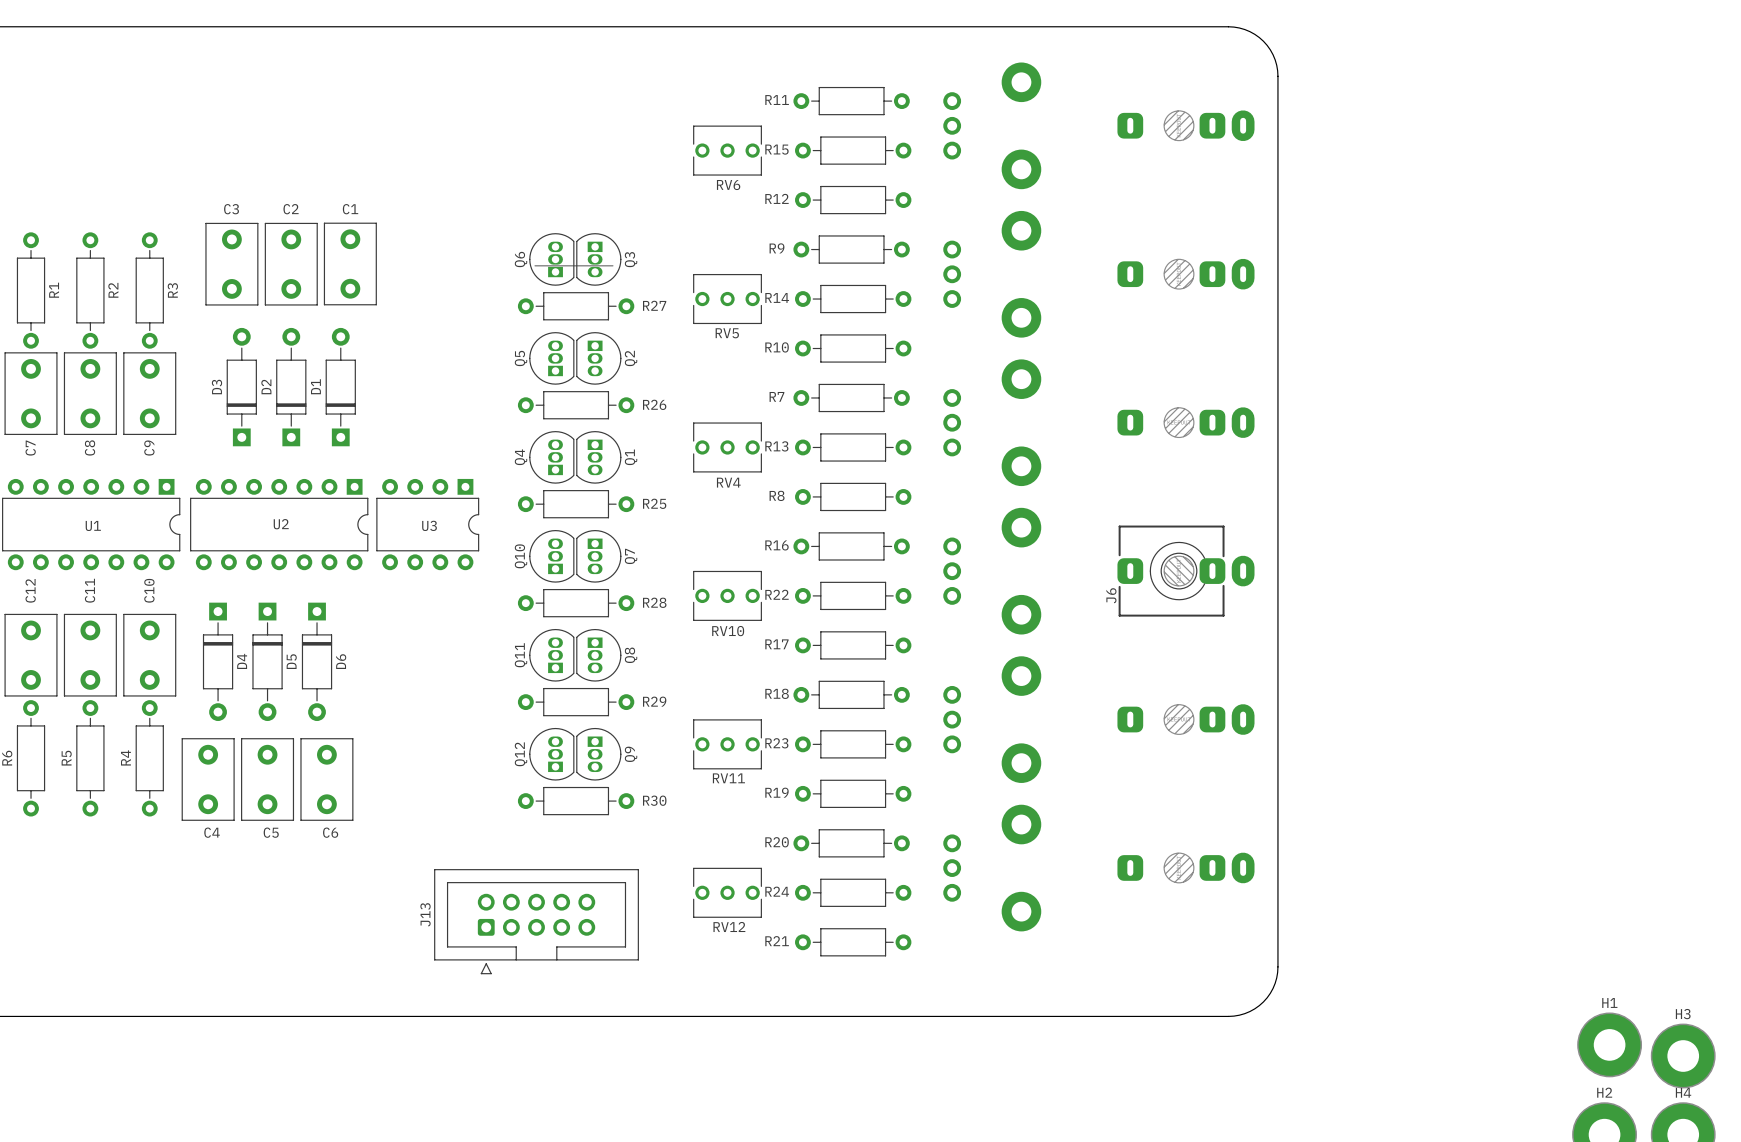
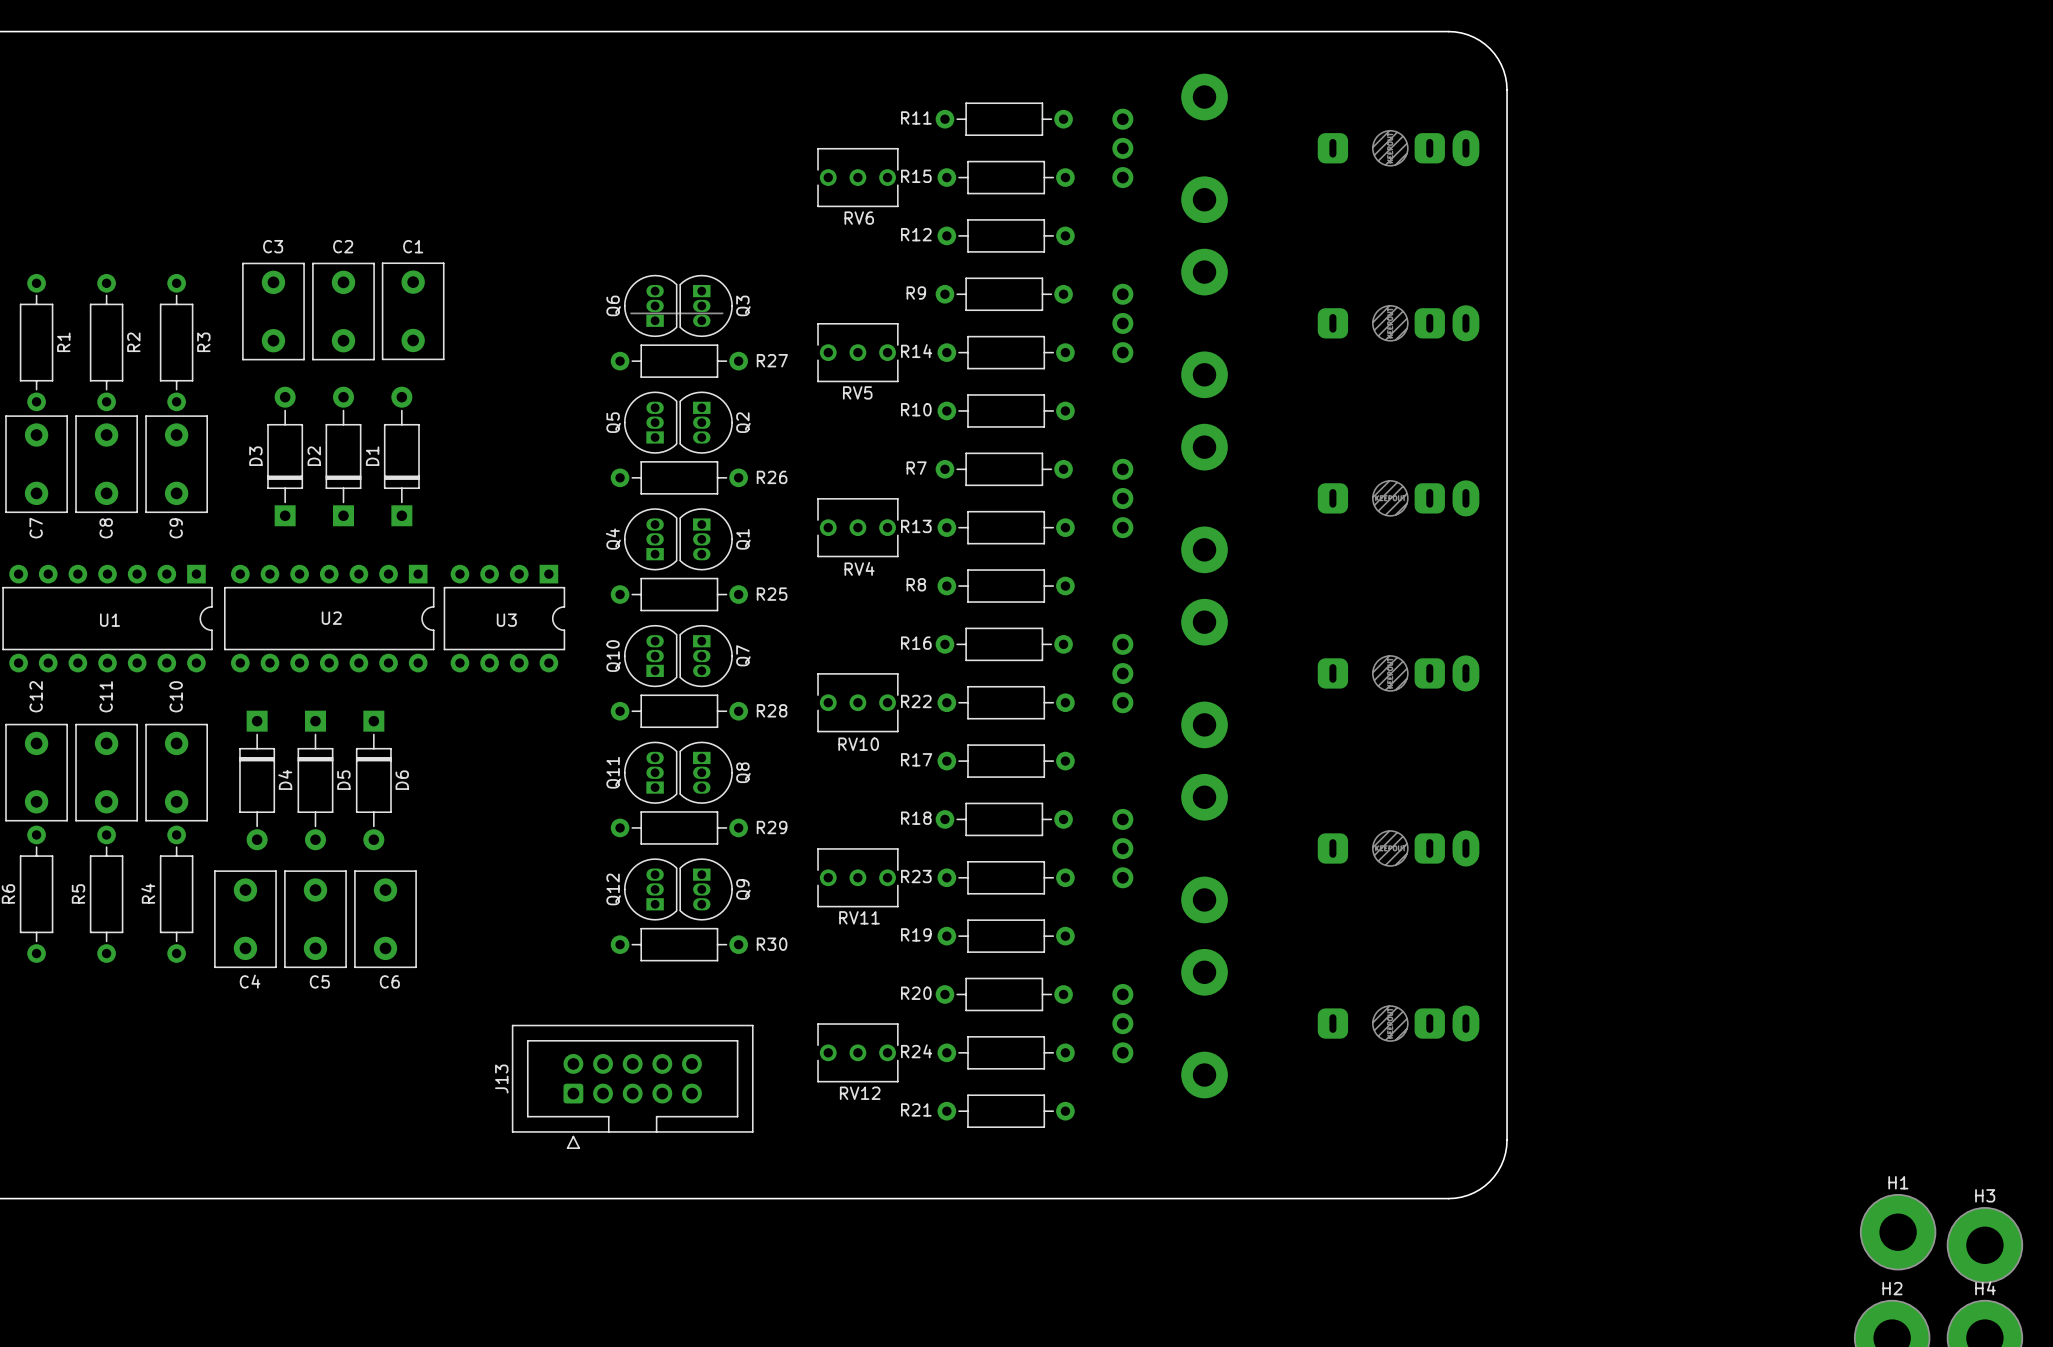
J6 side: top (1185, 571) -> bottom (1398, 673)

